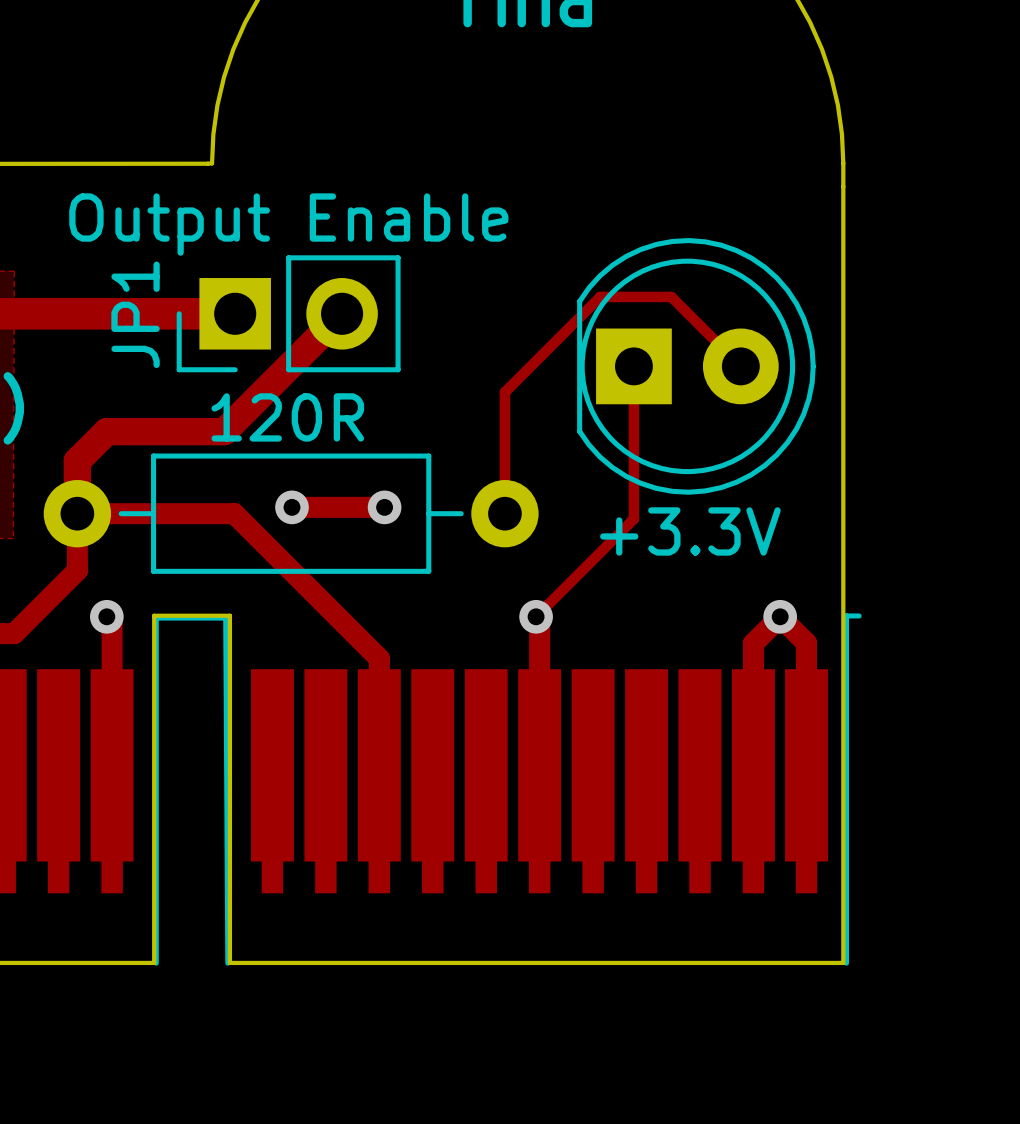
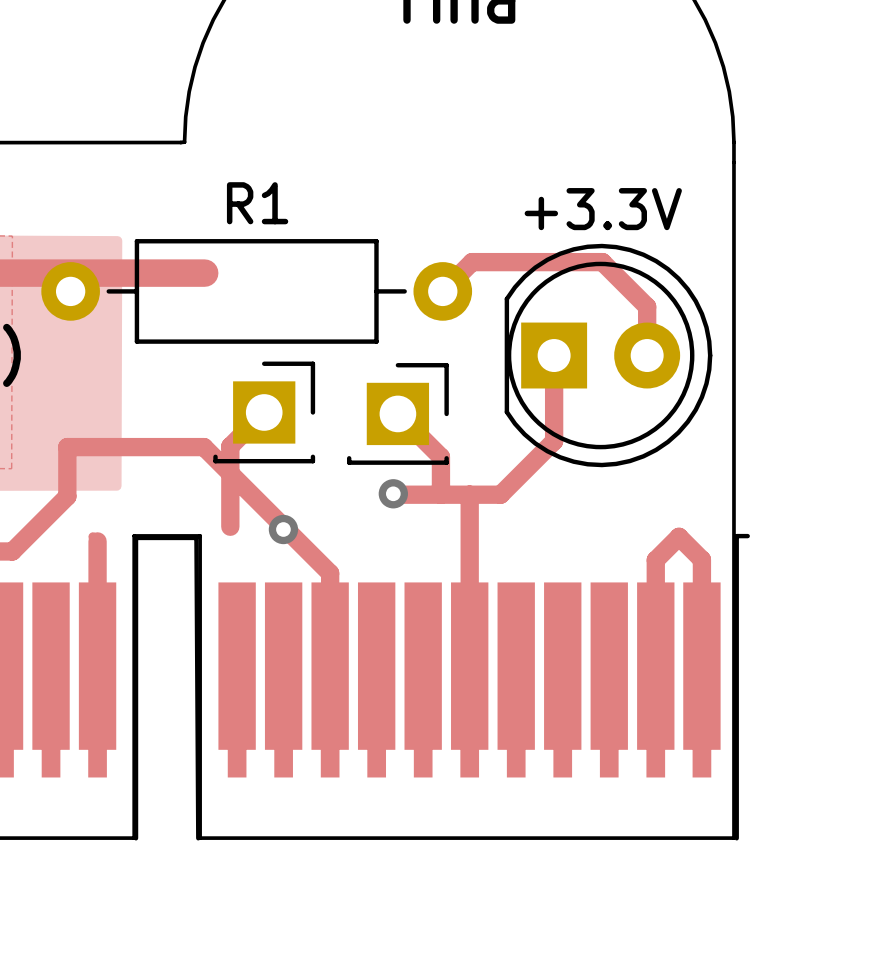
JP1: Output Enable (288, 313) -> none
track: (342, 313) (224, 431) (106, 431) (77, 461) (77, 513) (142, 513) -> none
R1: none -> (256, 291)
track: none -> (442, 291) (472, 262) (602, 262) (647, 306) (647, 355)
track: (633, 366) (633, 518) (536, 616) (539, 620) -> (469, 494) (469, 539)
part: +3.3V (696, 366) -> none
track: (740, 366) (671, 296) (600, 296) (504, 392) (504, 513) -> none
track: none -> (554, 355) (554, 441) (500, 494) (393, 493)
+3.3V: none -> (608, 355)
part value: 120R (287, 417) -> none
part footprint: [43, 453, 539, 574] -> [213, 361, 316, 464]
track: none -> (264, 412) (230, 446) (230, 526)
track: none -> (397, 413) (440, 456) (440, 494) (439, 492)
part: none -> (397, 413)
track: (292, 507) (384, 507) -> none
via: (292, 507) -> none
via: (384, 507) -> none
via: none -> (393, 493)
via: none -> (283, 529)
via: (106, 616) -> none
via: (536, 616) -> none
via: (780, 616) -> none

